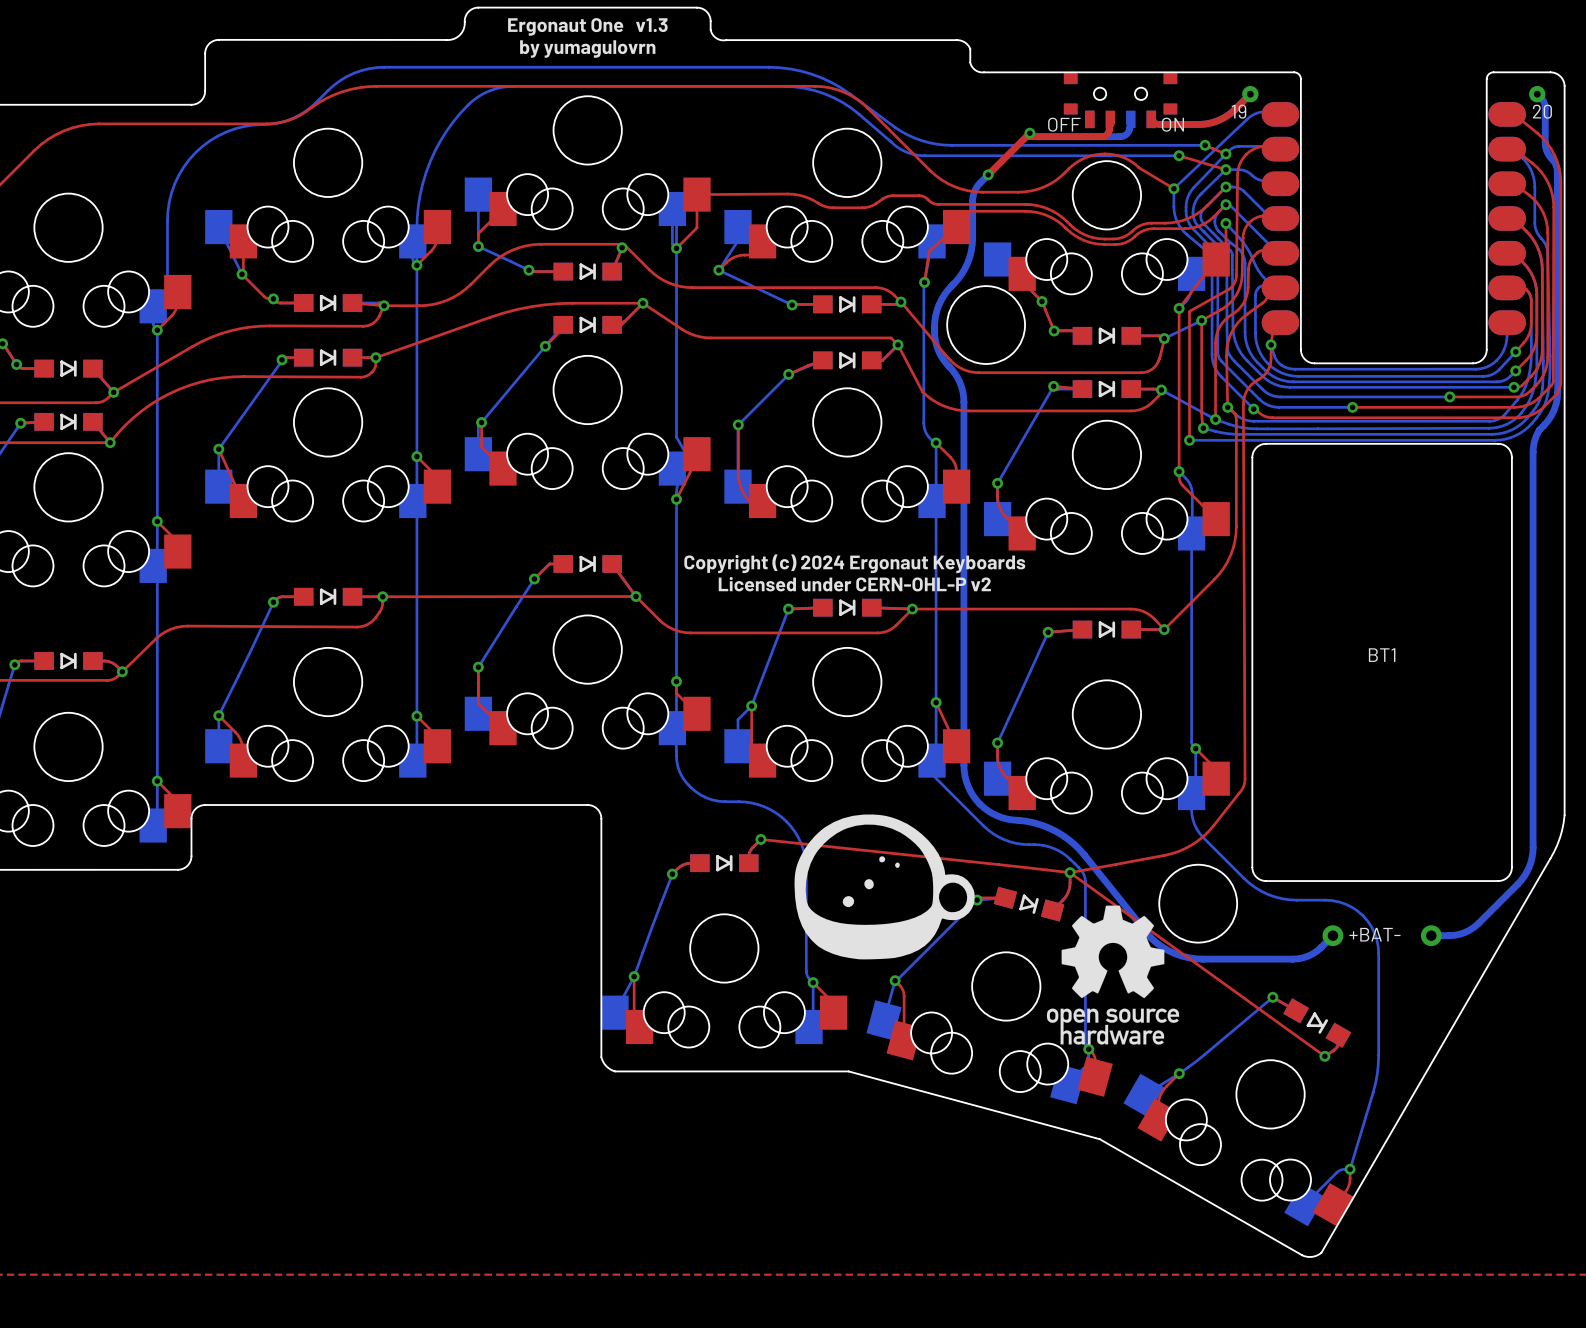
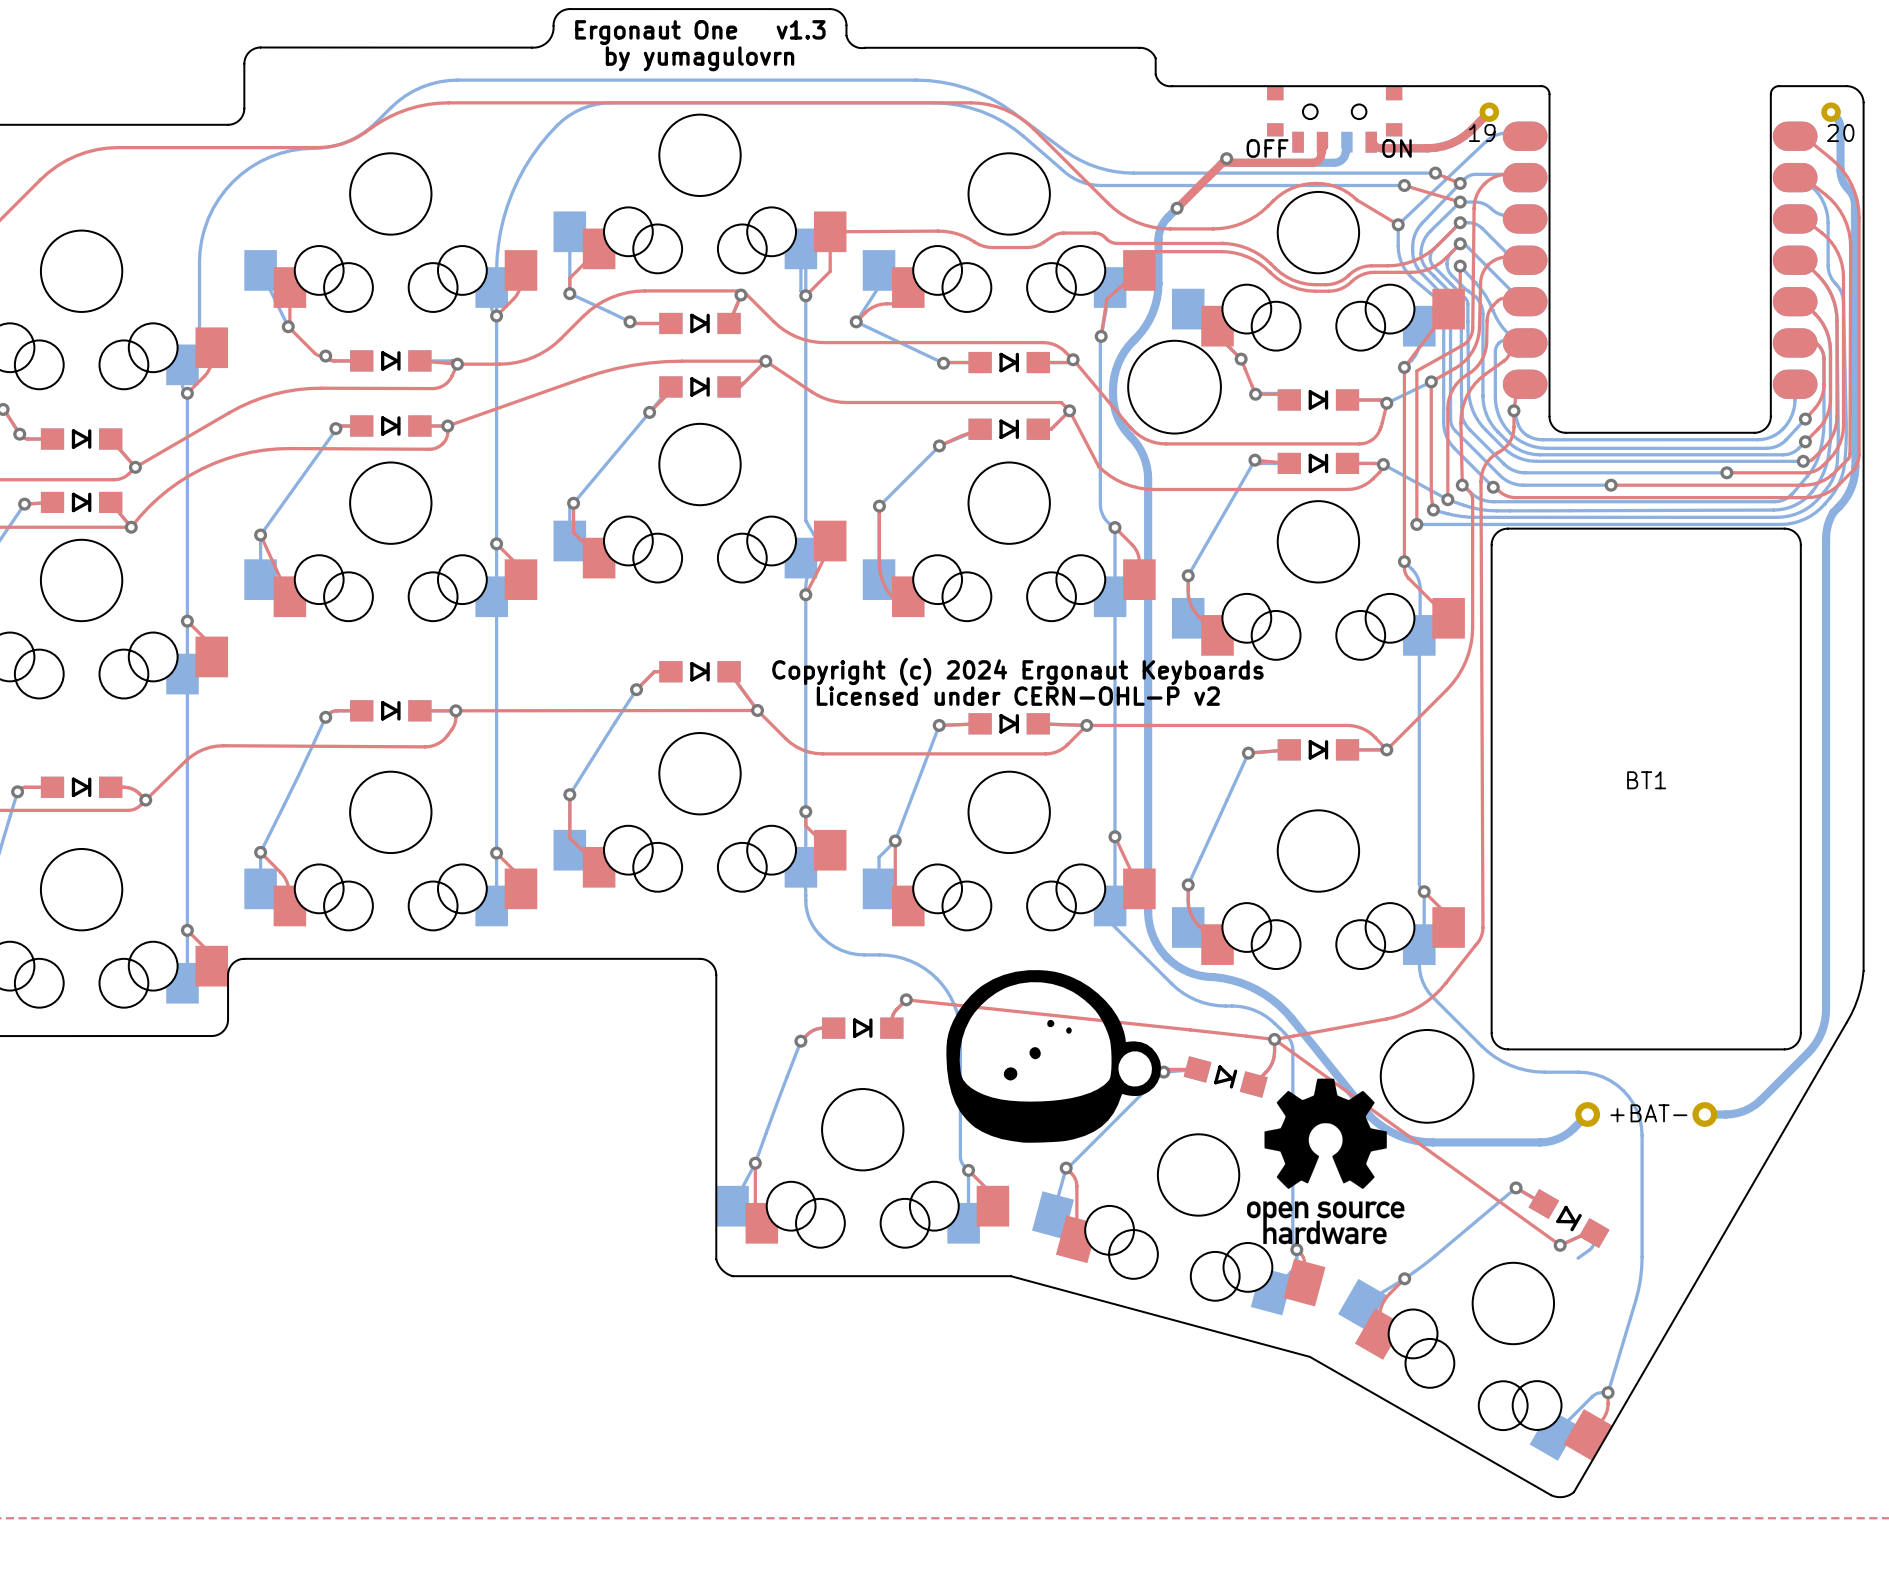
top track: (1338, 1041) (1335, 1049) (1324, 1056) (1309, 1045) -> (1588, 1232) (1560, 1245)
via position: (1324, 1056) -> (1560, 1245)

